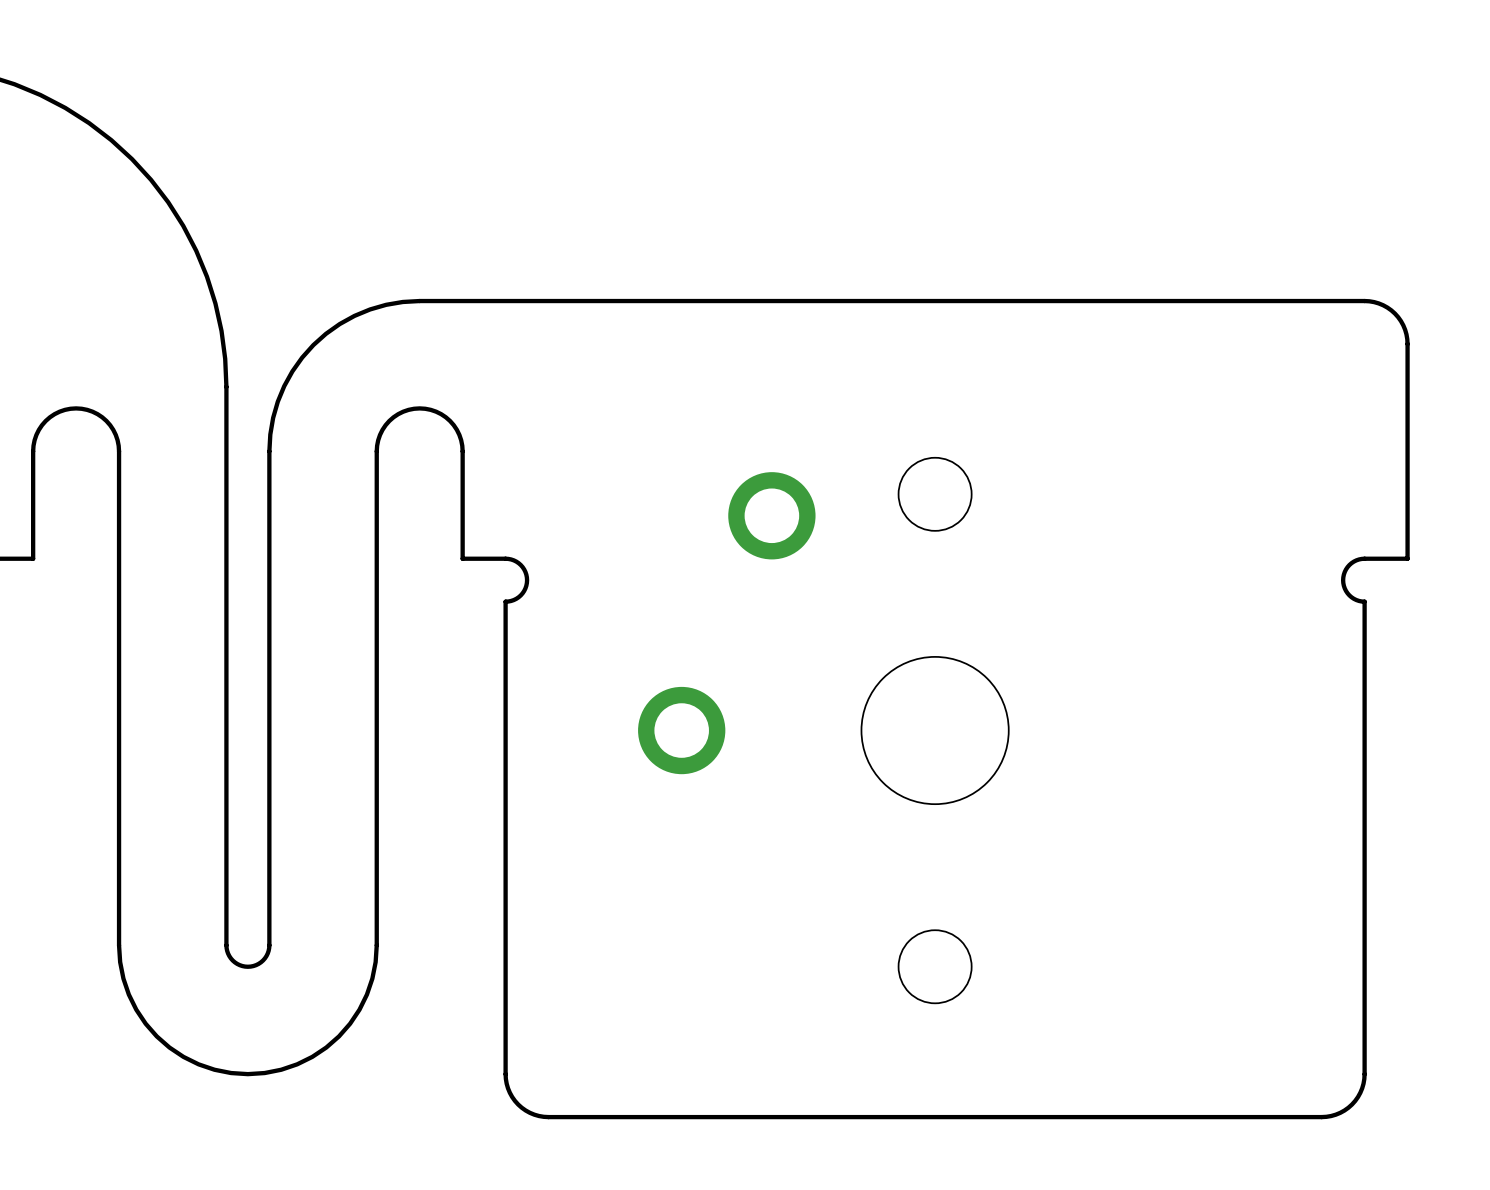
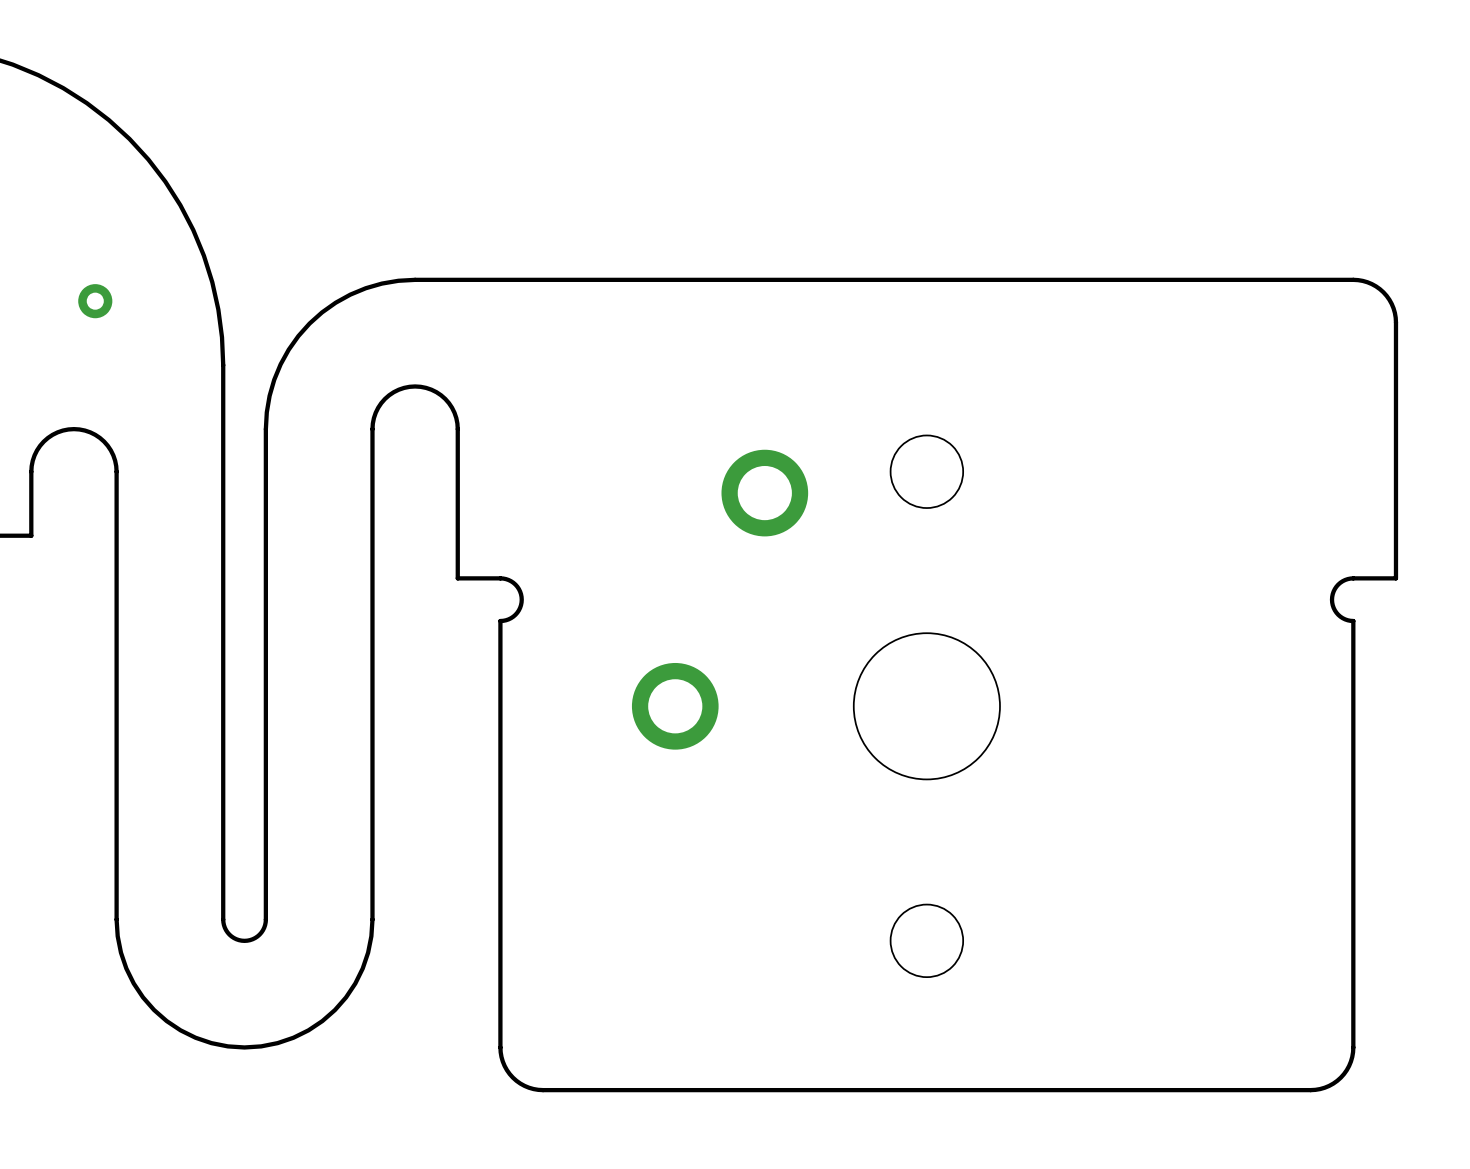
via: none -> (95, 301)
board edge: (33, 494) (33, 445) (38, 429) (54, 414) (76, 408) (97, 414) (113, 429) (118, 445) (119, 494) -> (31, 471) (34, 455) (43, 441) (57, 432) (73, 429) (90, 432) (104, 441) (113, 455) (116, 471)
board edge: (462, 558) (508, 558) (518, 563) (524, 569) (527, 580) (524, 590) (516, 598) (505, 601) (505, 644) -> (457, 535) (457, 578) (503, 578) (513, 582) (518, 589) (521, 599) (518, 610) (511, 618) (500, 621)
board edge: (1407, 558) (1361, 558) (1351, 563) (1346, 569) (1343, 580) (1346, 590) (1353, 598) (1364, 601) (1364, 644) -> (1395, 535) (1395, 578) (1350, 578) (1340, 582) (1334, 589) (1332, 599) (1334, 610) (1342, 618) (1353, 621)

